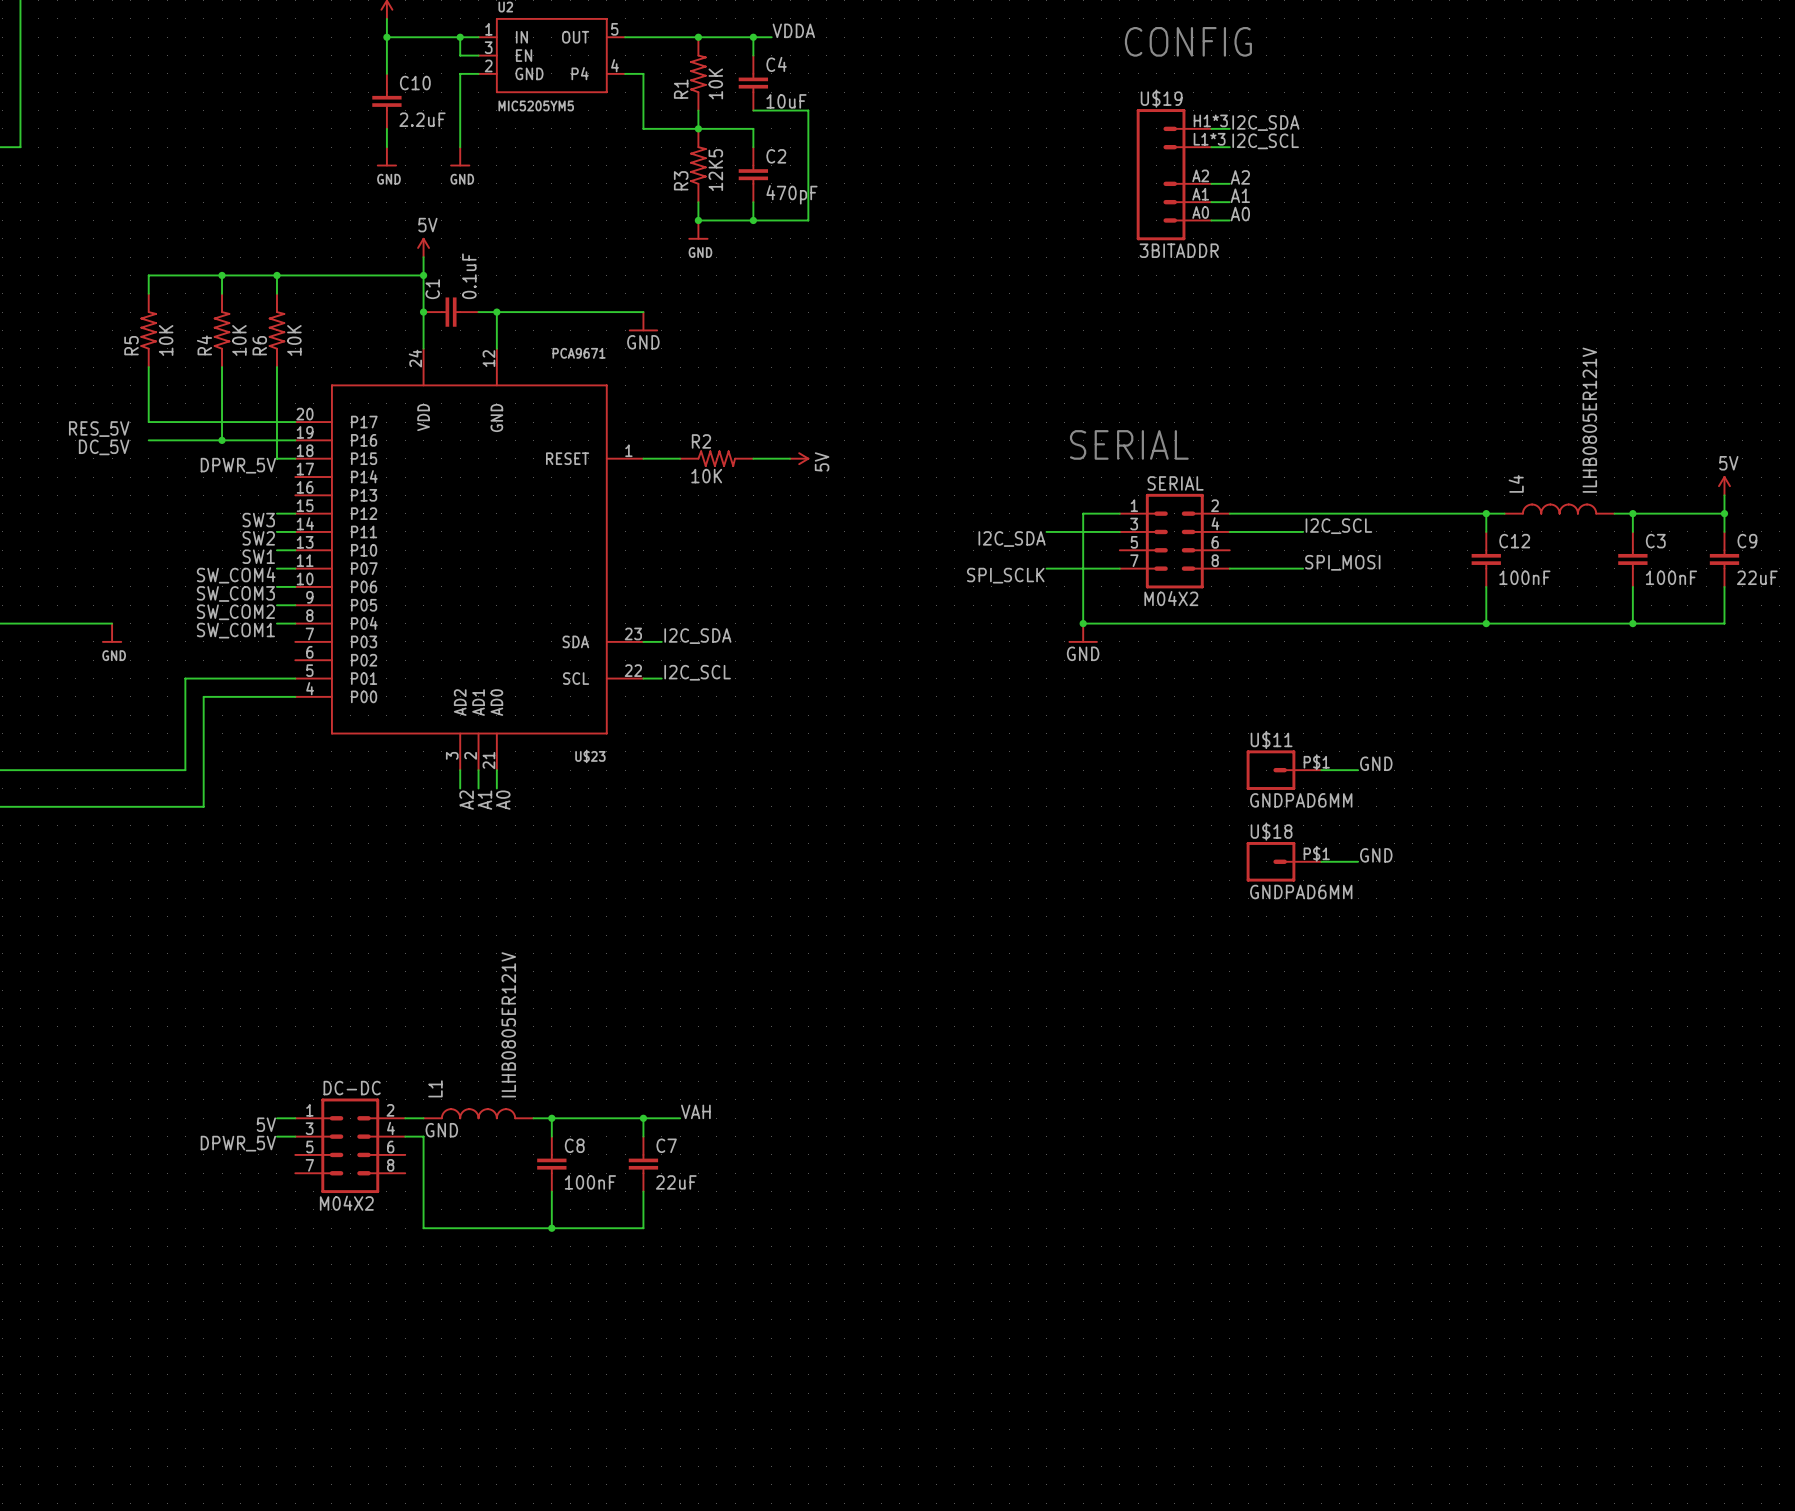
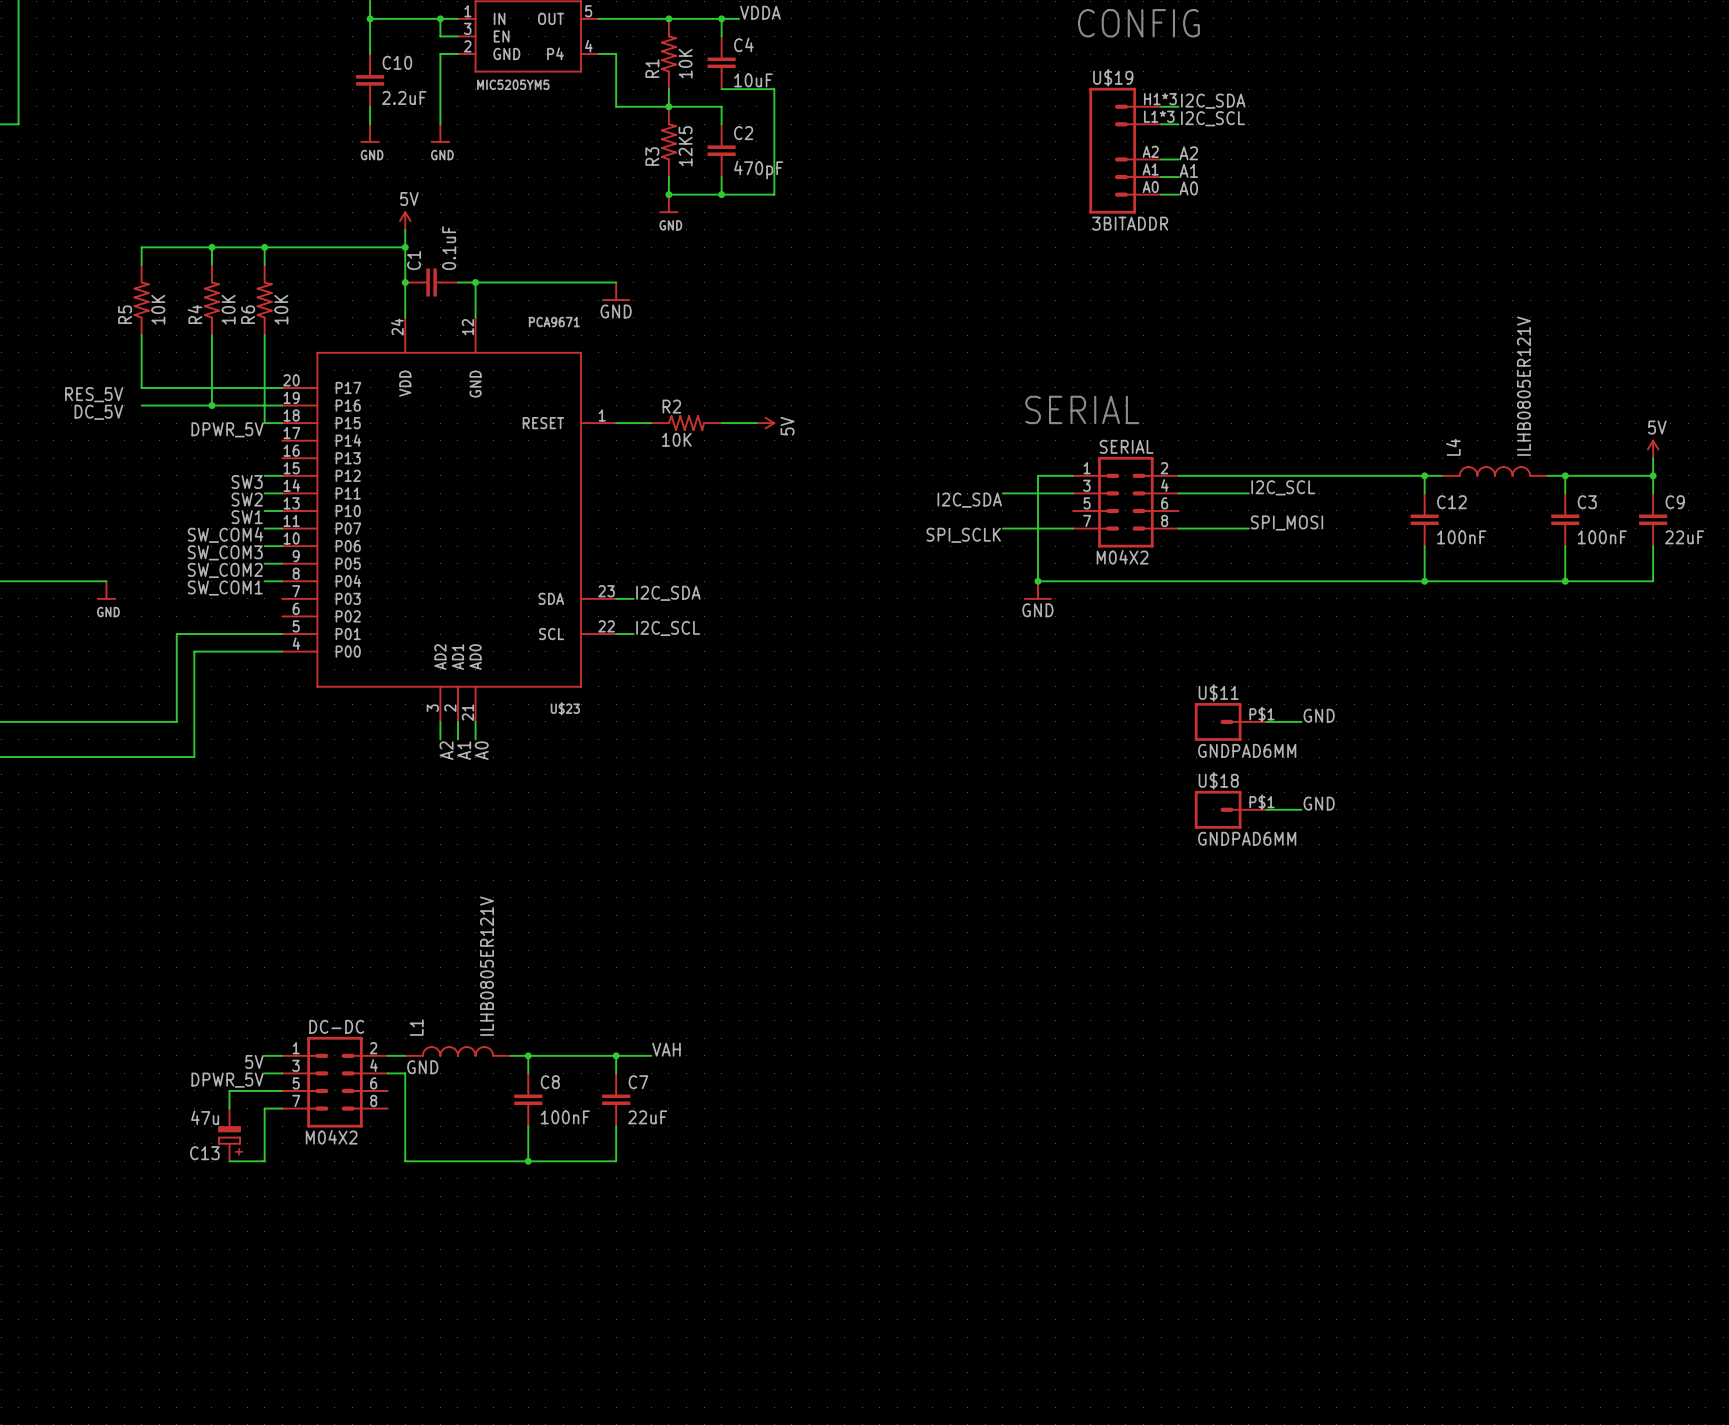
wire: none -> (282, 1090) (229, 1090) (229, 1108)
wire: none -> (282, 1108) (264, 1108) (264, 1161) (229, 1161)
C13: none -> 47u (229, 1134)

